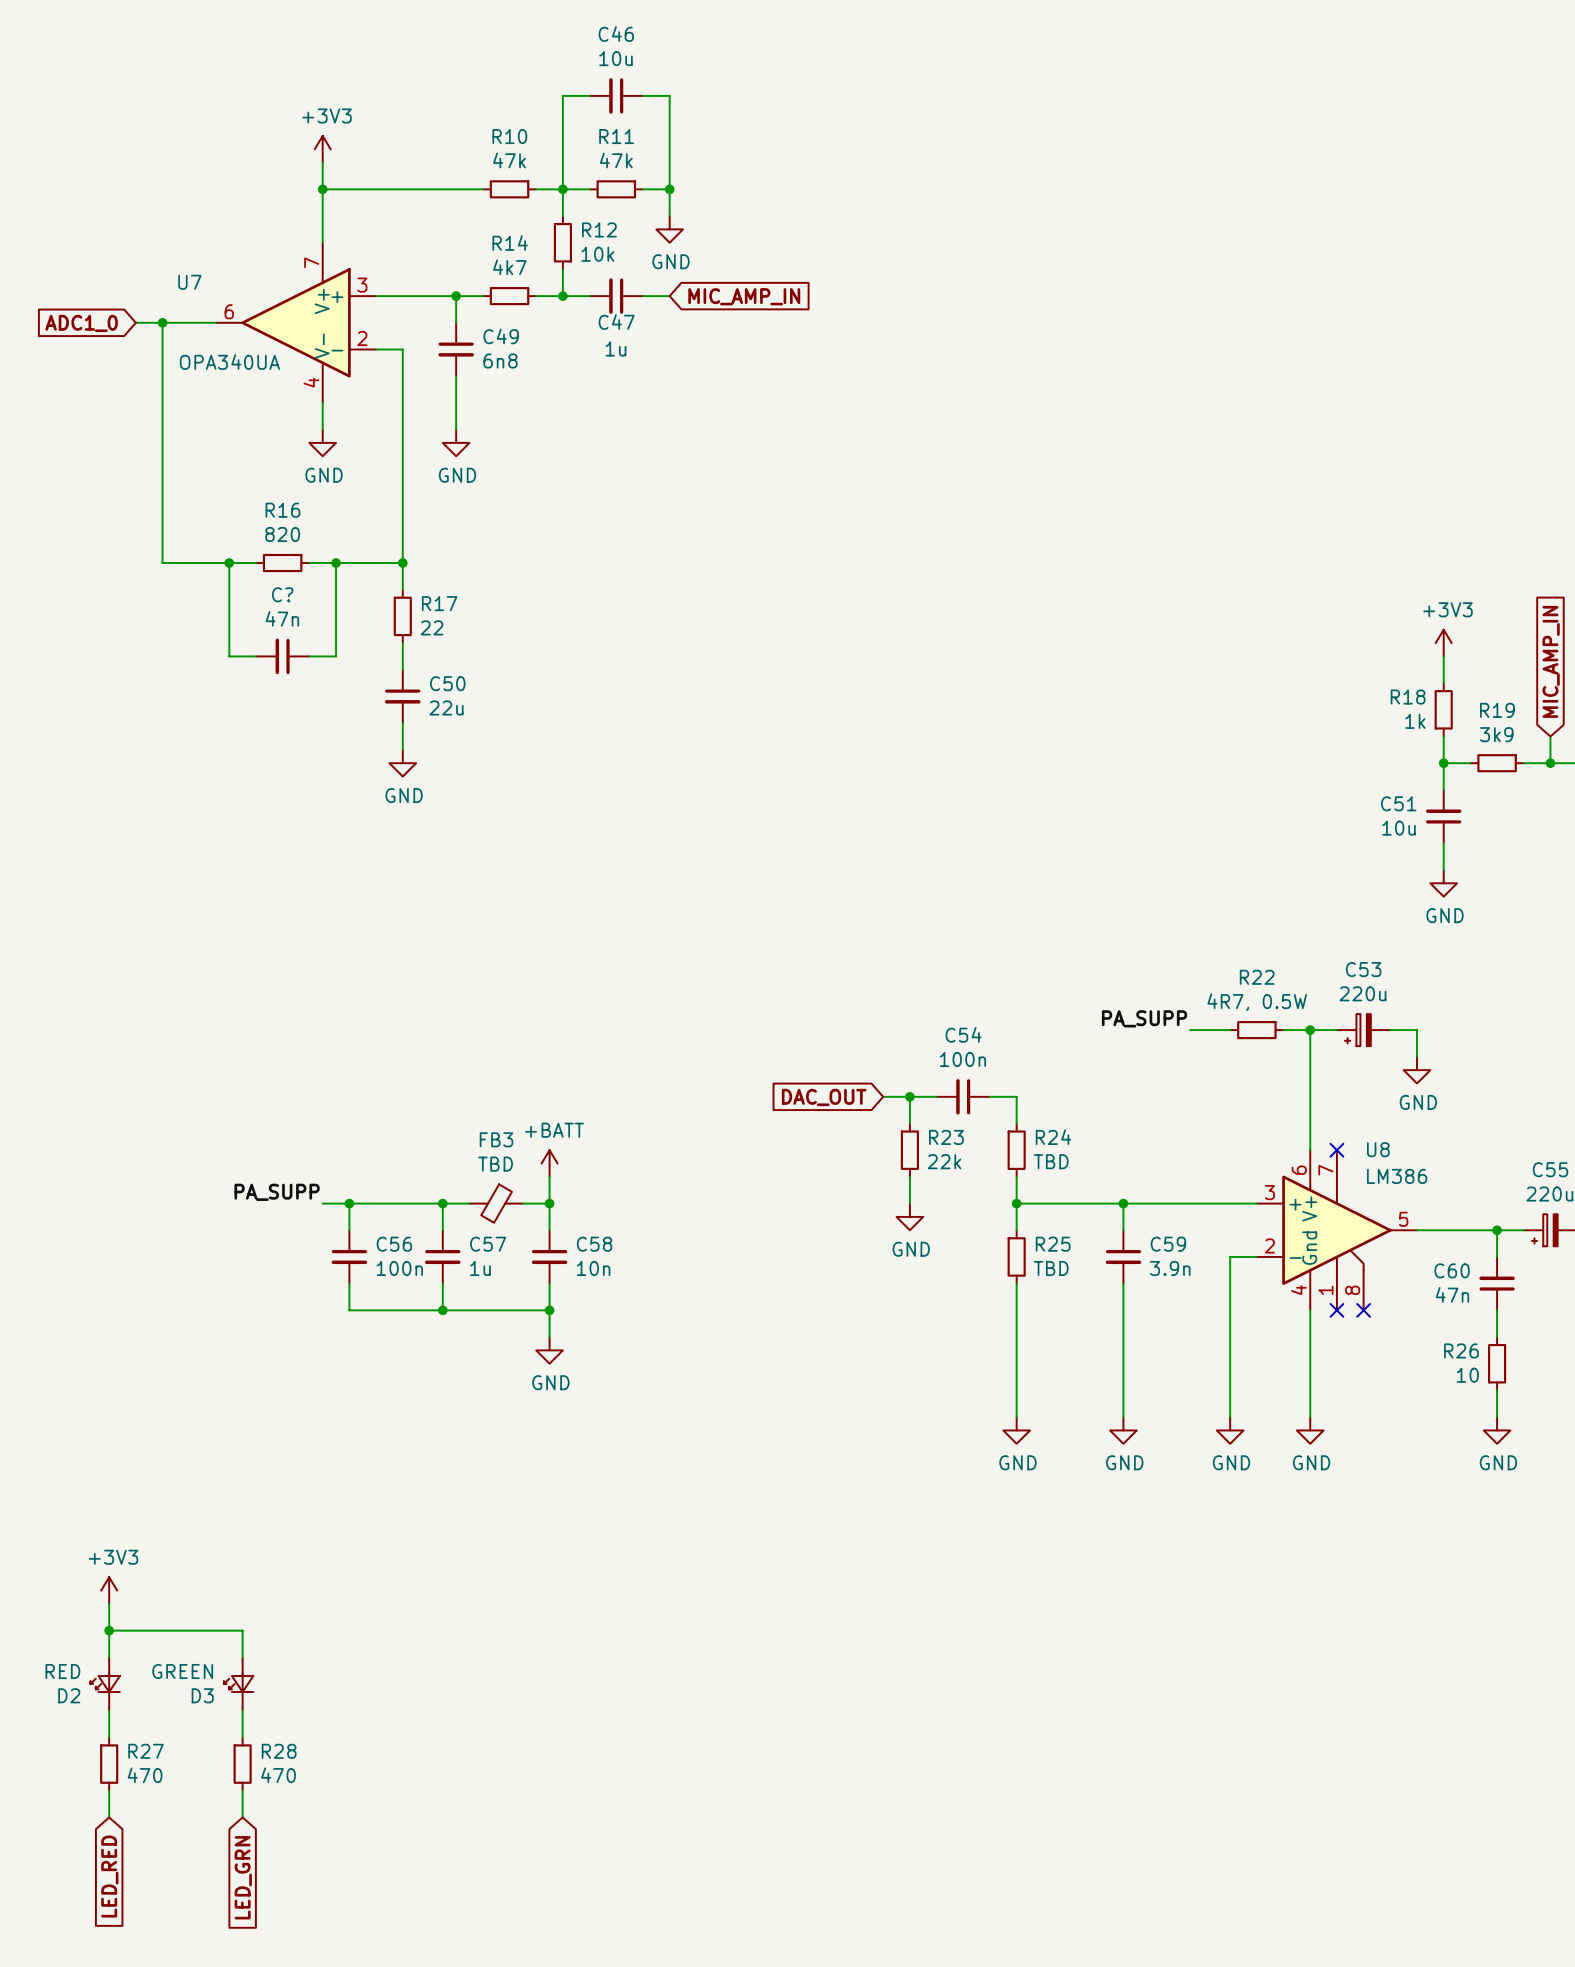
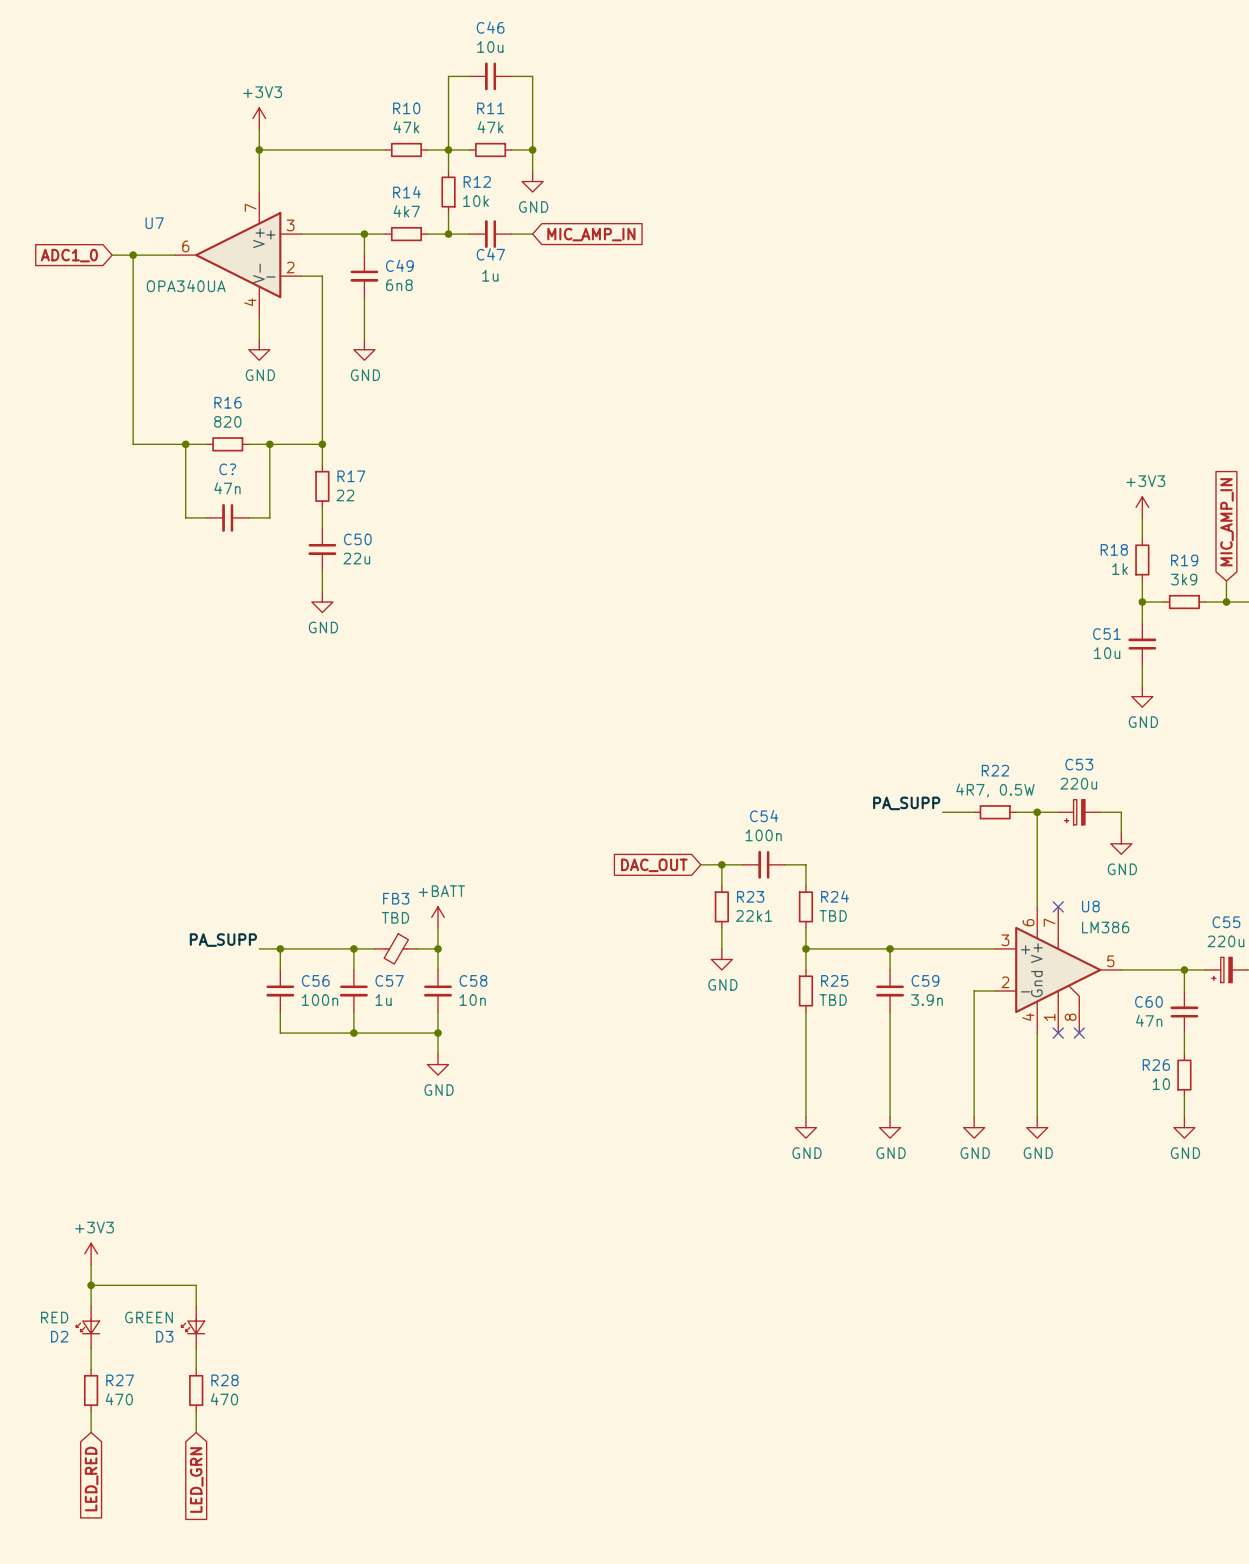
R23 value: 22k (944, 1161) -> 22k1 (754, 915)

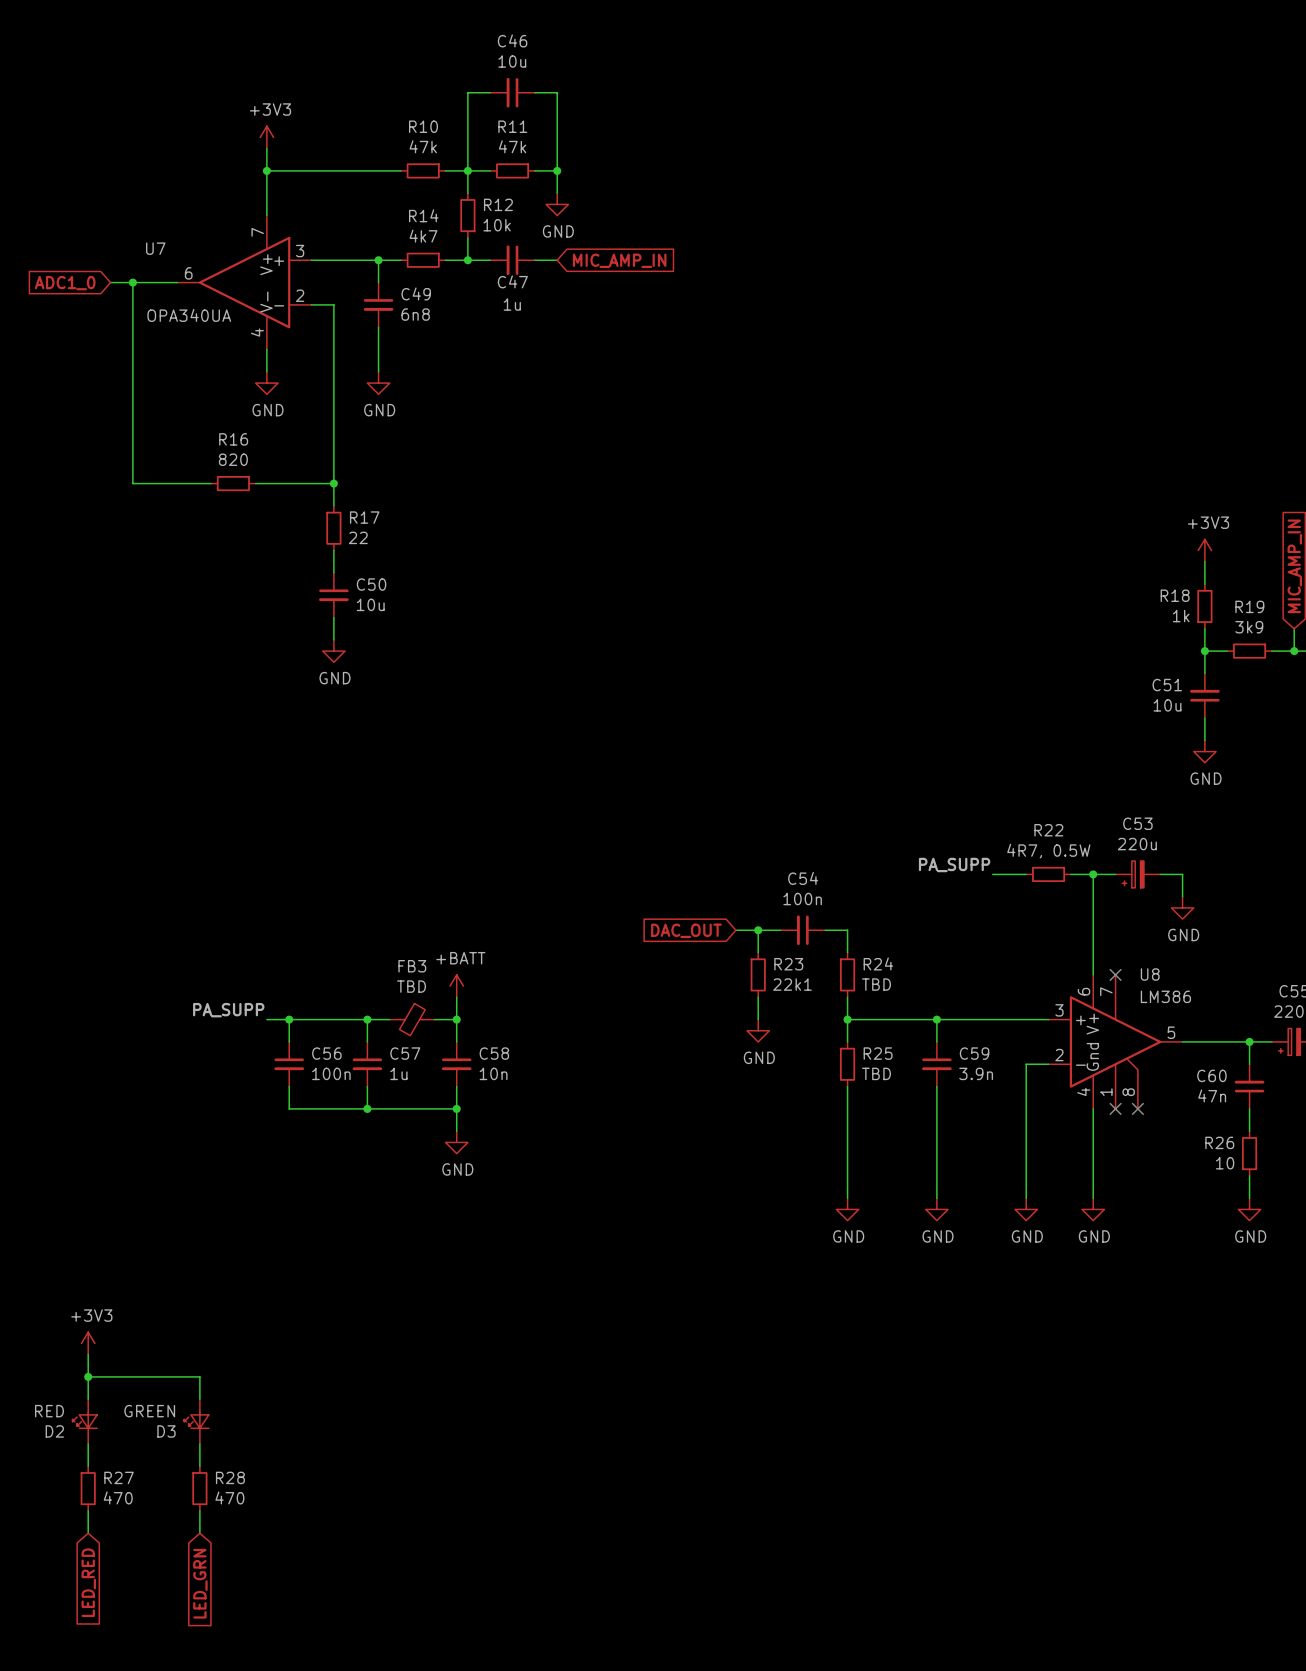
wire: (185, 444) (185, 517) (206, 517) -> none
junction: (185, 444) -> none
wire: (269, 444) (269, 517) (248, 517) -> none
junction: (269, 444) -> none
C?: 47n (227, 517) -> none
C50 value: 22u (356, 558) -> 10u (370, 604)

